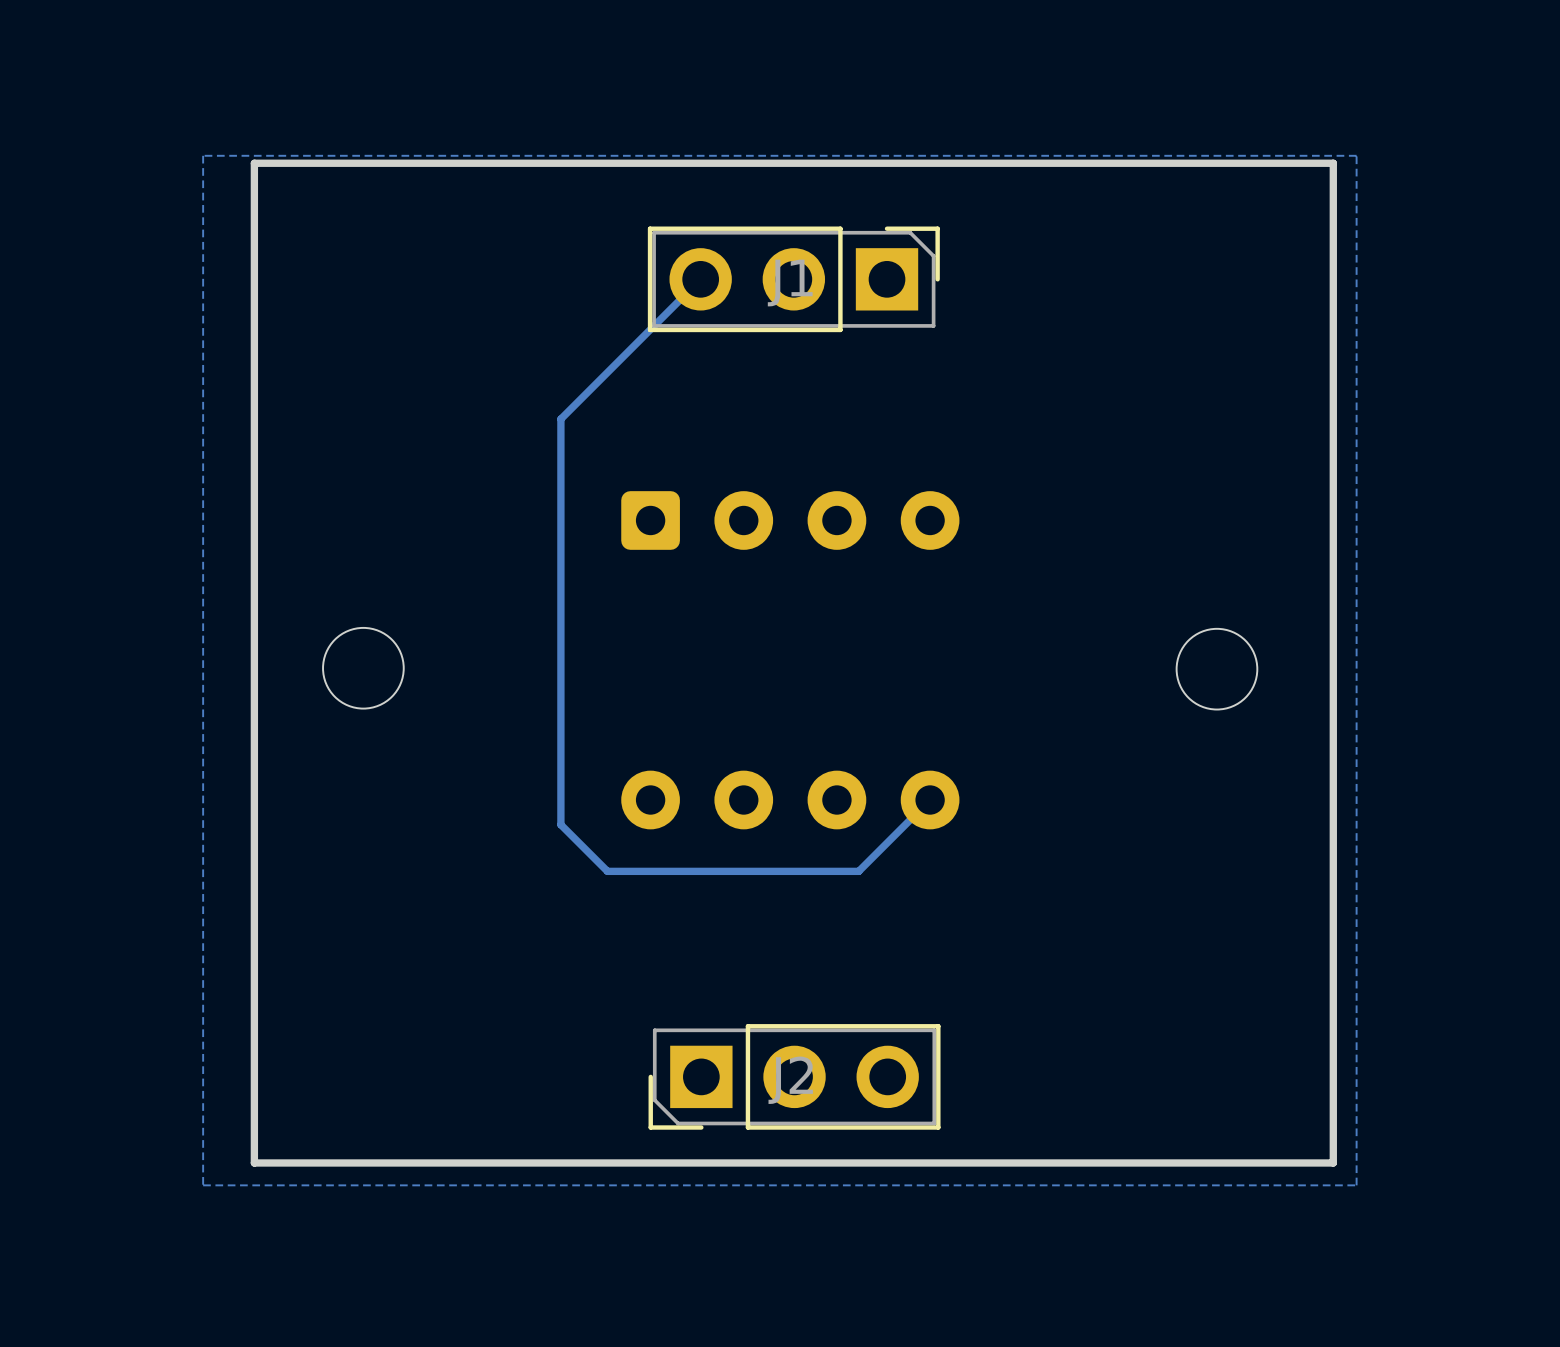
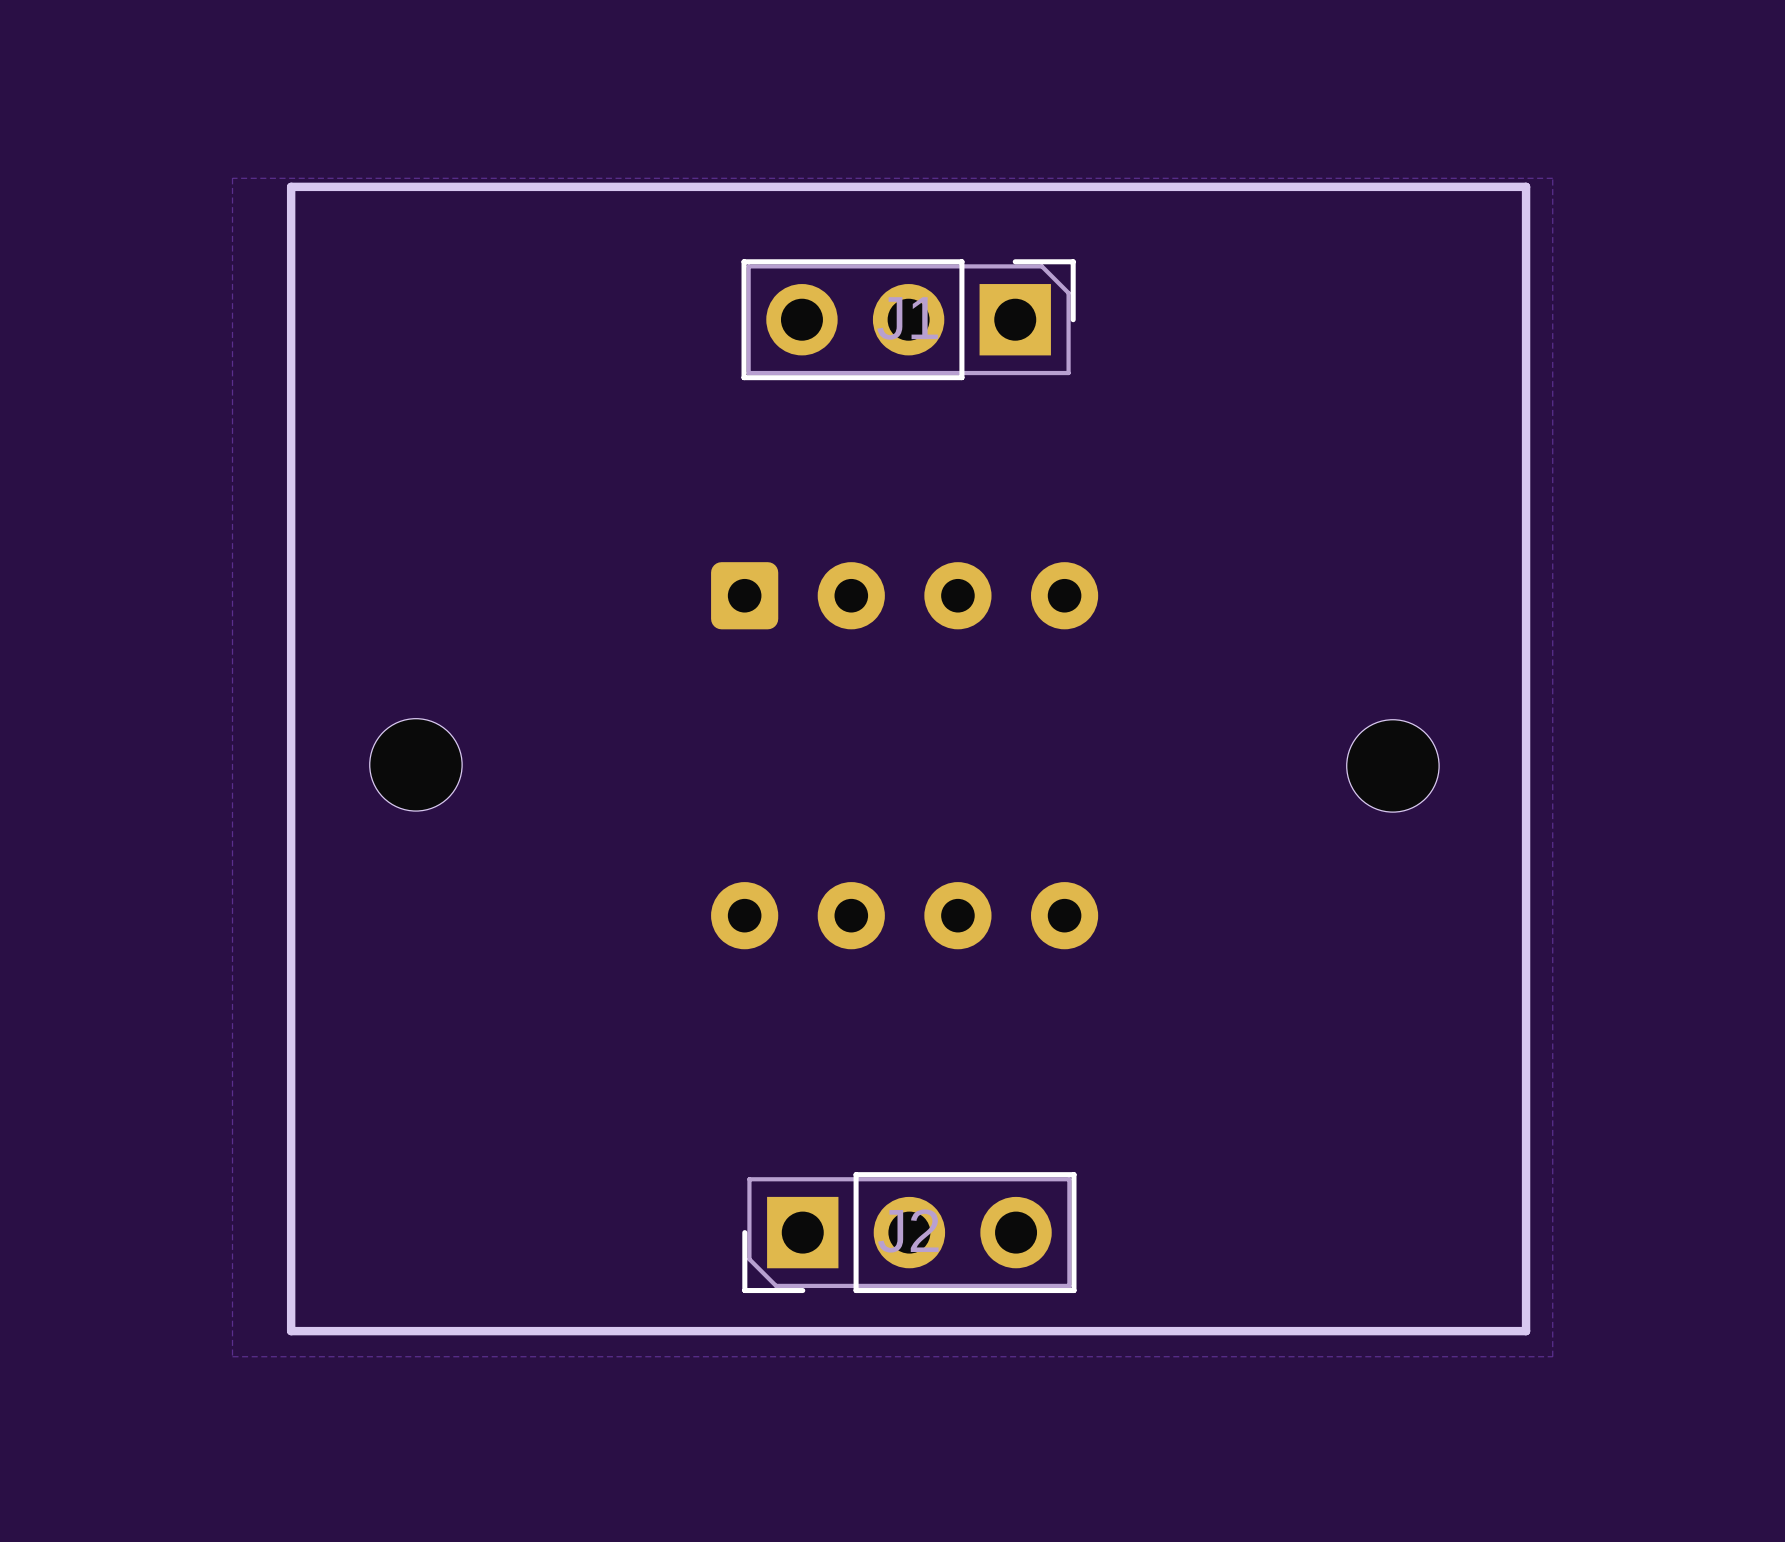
track: (700, 279) (560, 419) (560, 824) (607, 871) (858, 871) (930, 800) -> none

